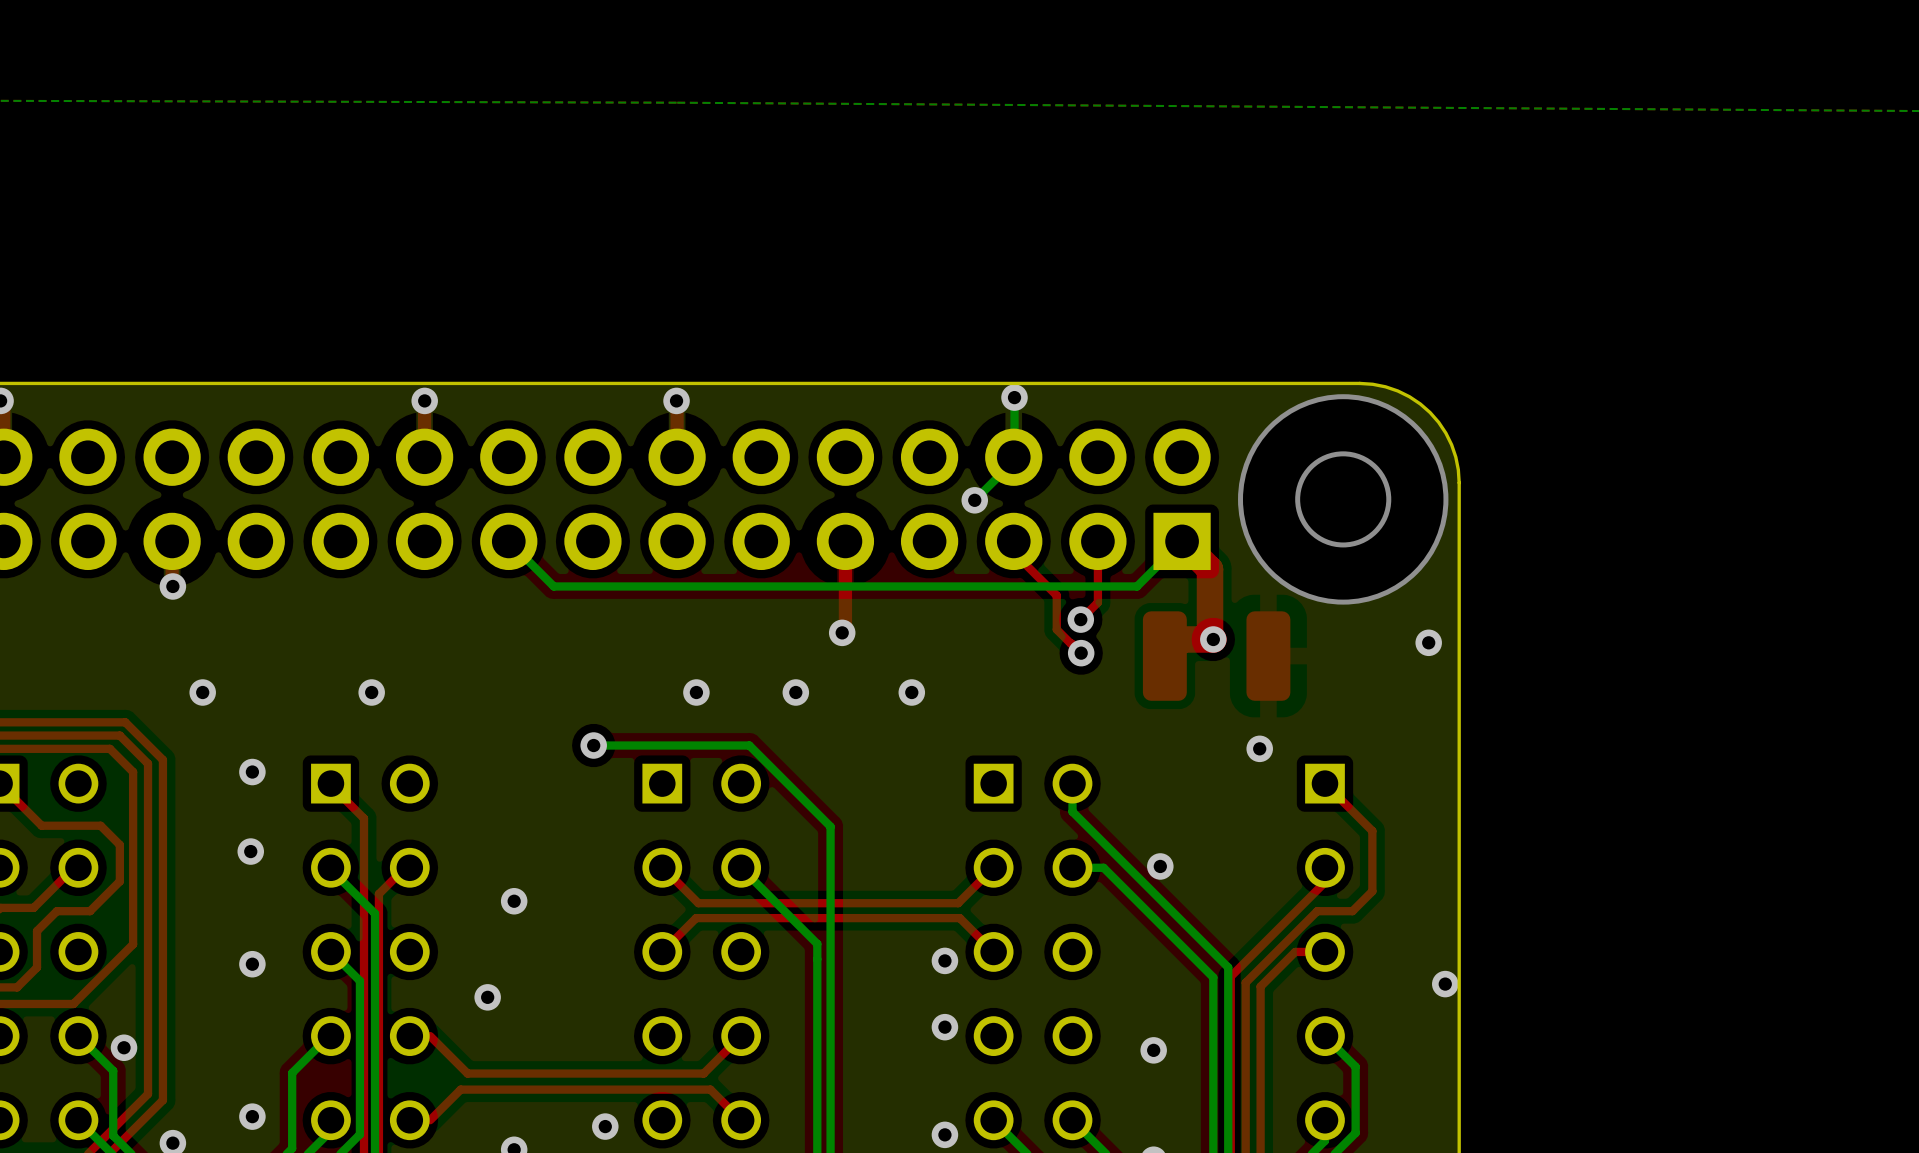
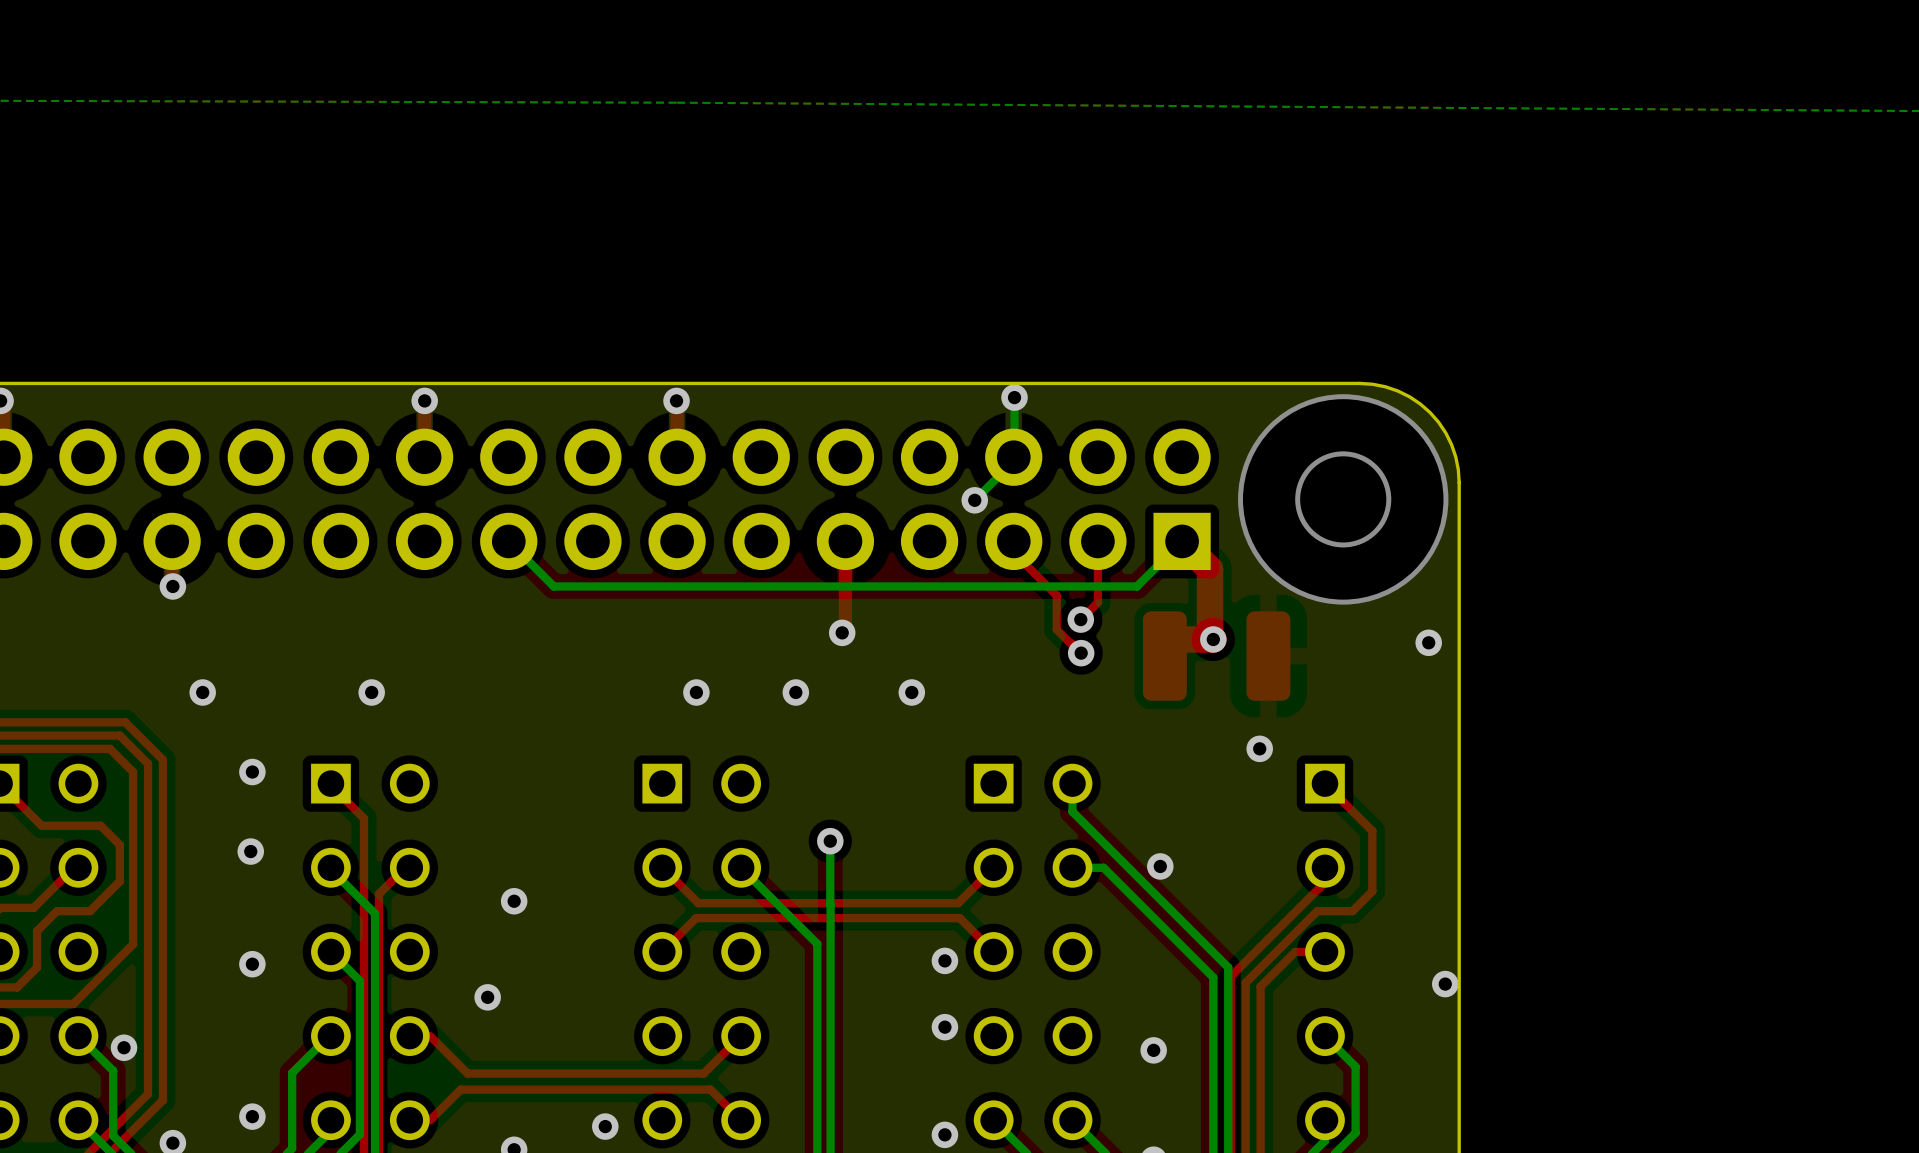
bottom track: (593, 745) (749, 745) (830, 826) (830, 904) -> (830, 841) (830, 904)
via: (593, 745) -> none
via: none -> (830, 841)

